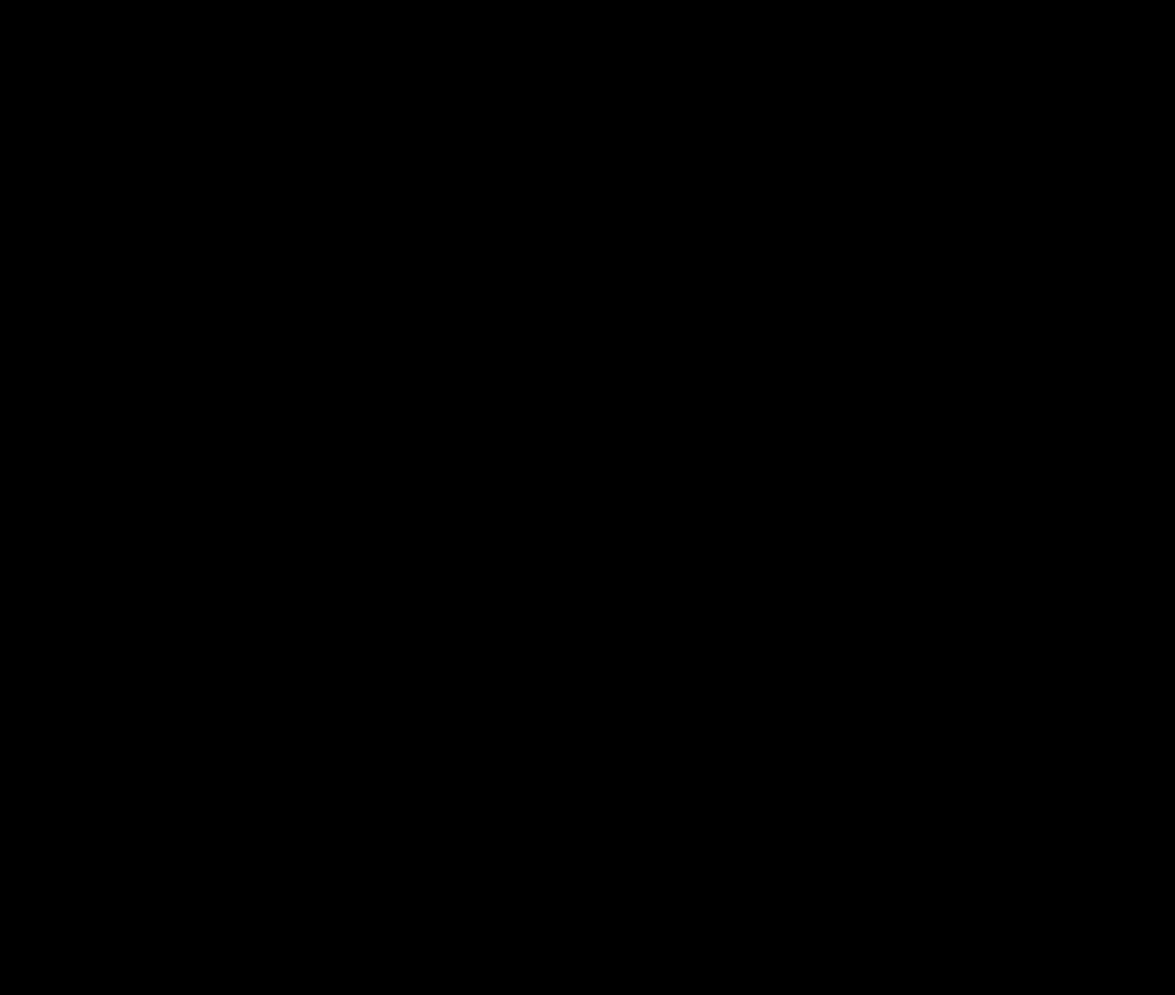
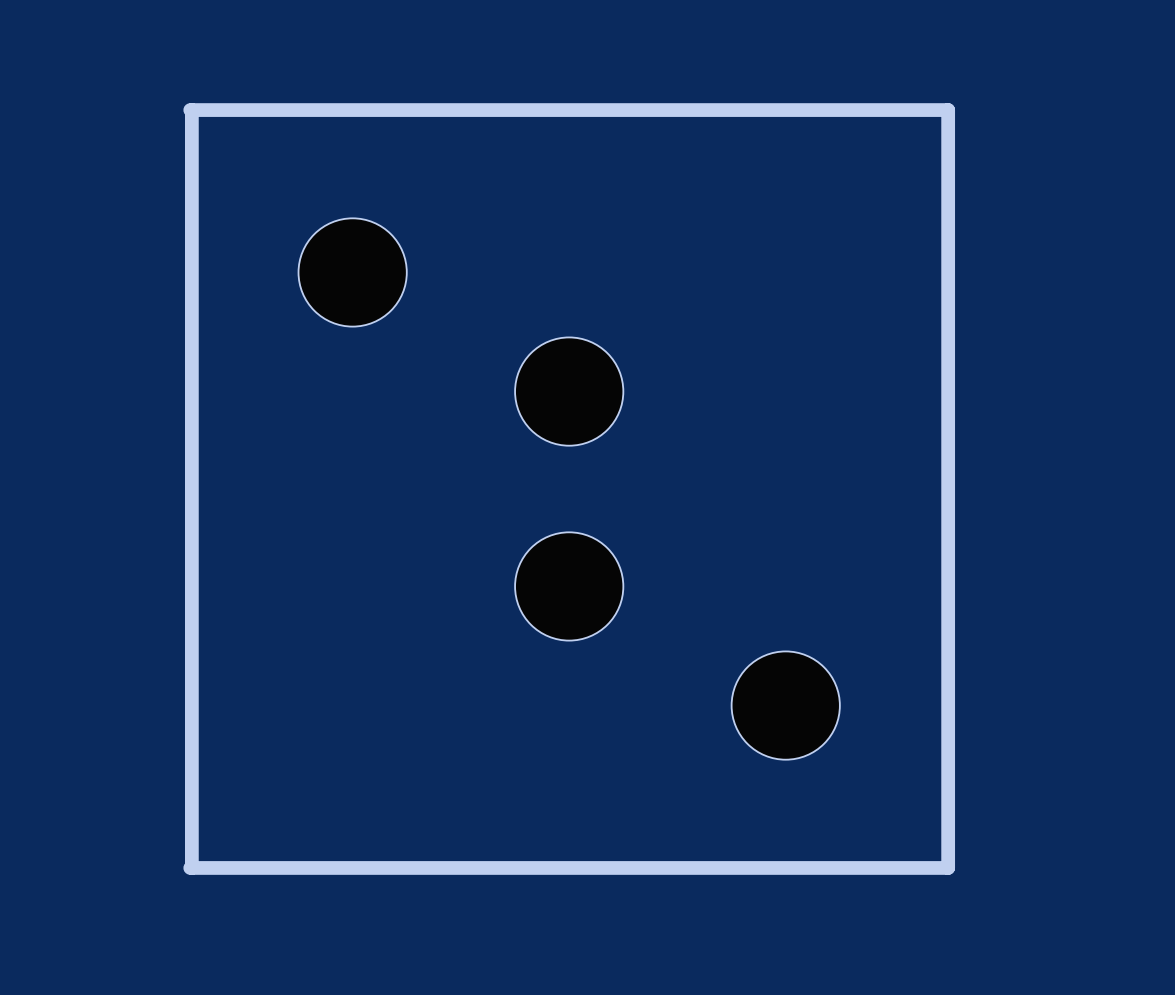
board edge: none -> (190, 110) (948, 110) (948, 867) (190, 867)
board edge: none -> (191, 110) (191, 867)
hole: none -> (352, 272)
hole: none -> (569, 391)
hole: none -> (569, 586)
hole: none -> (785, 705)

